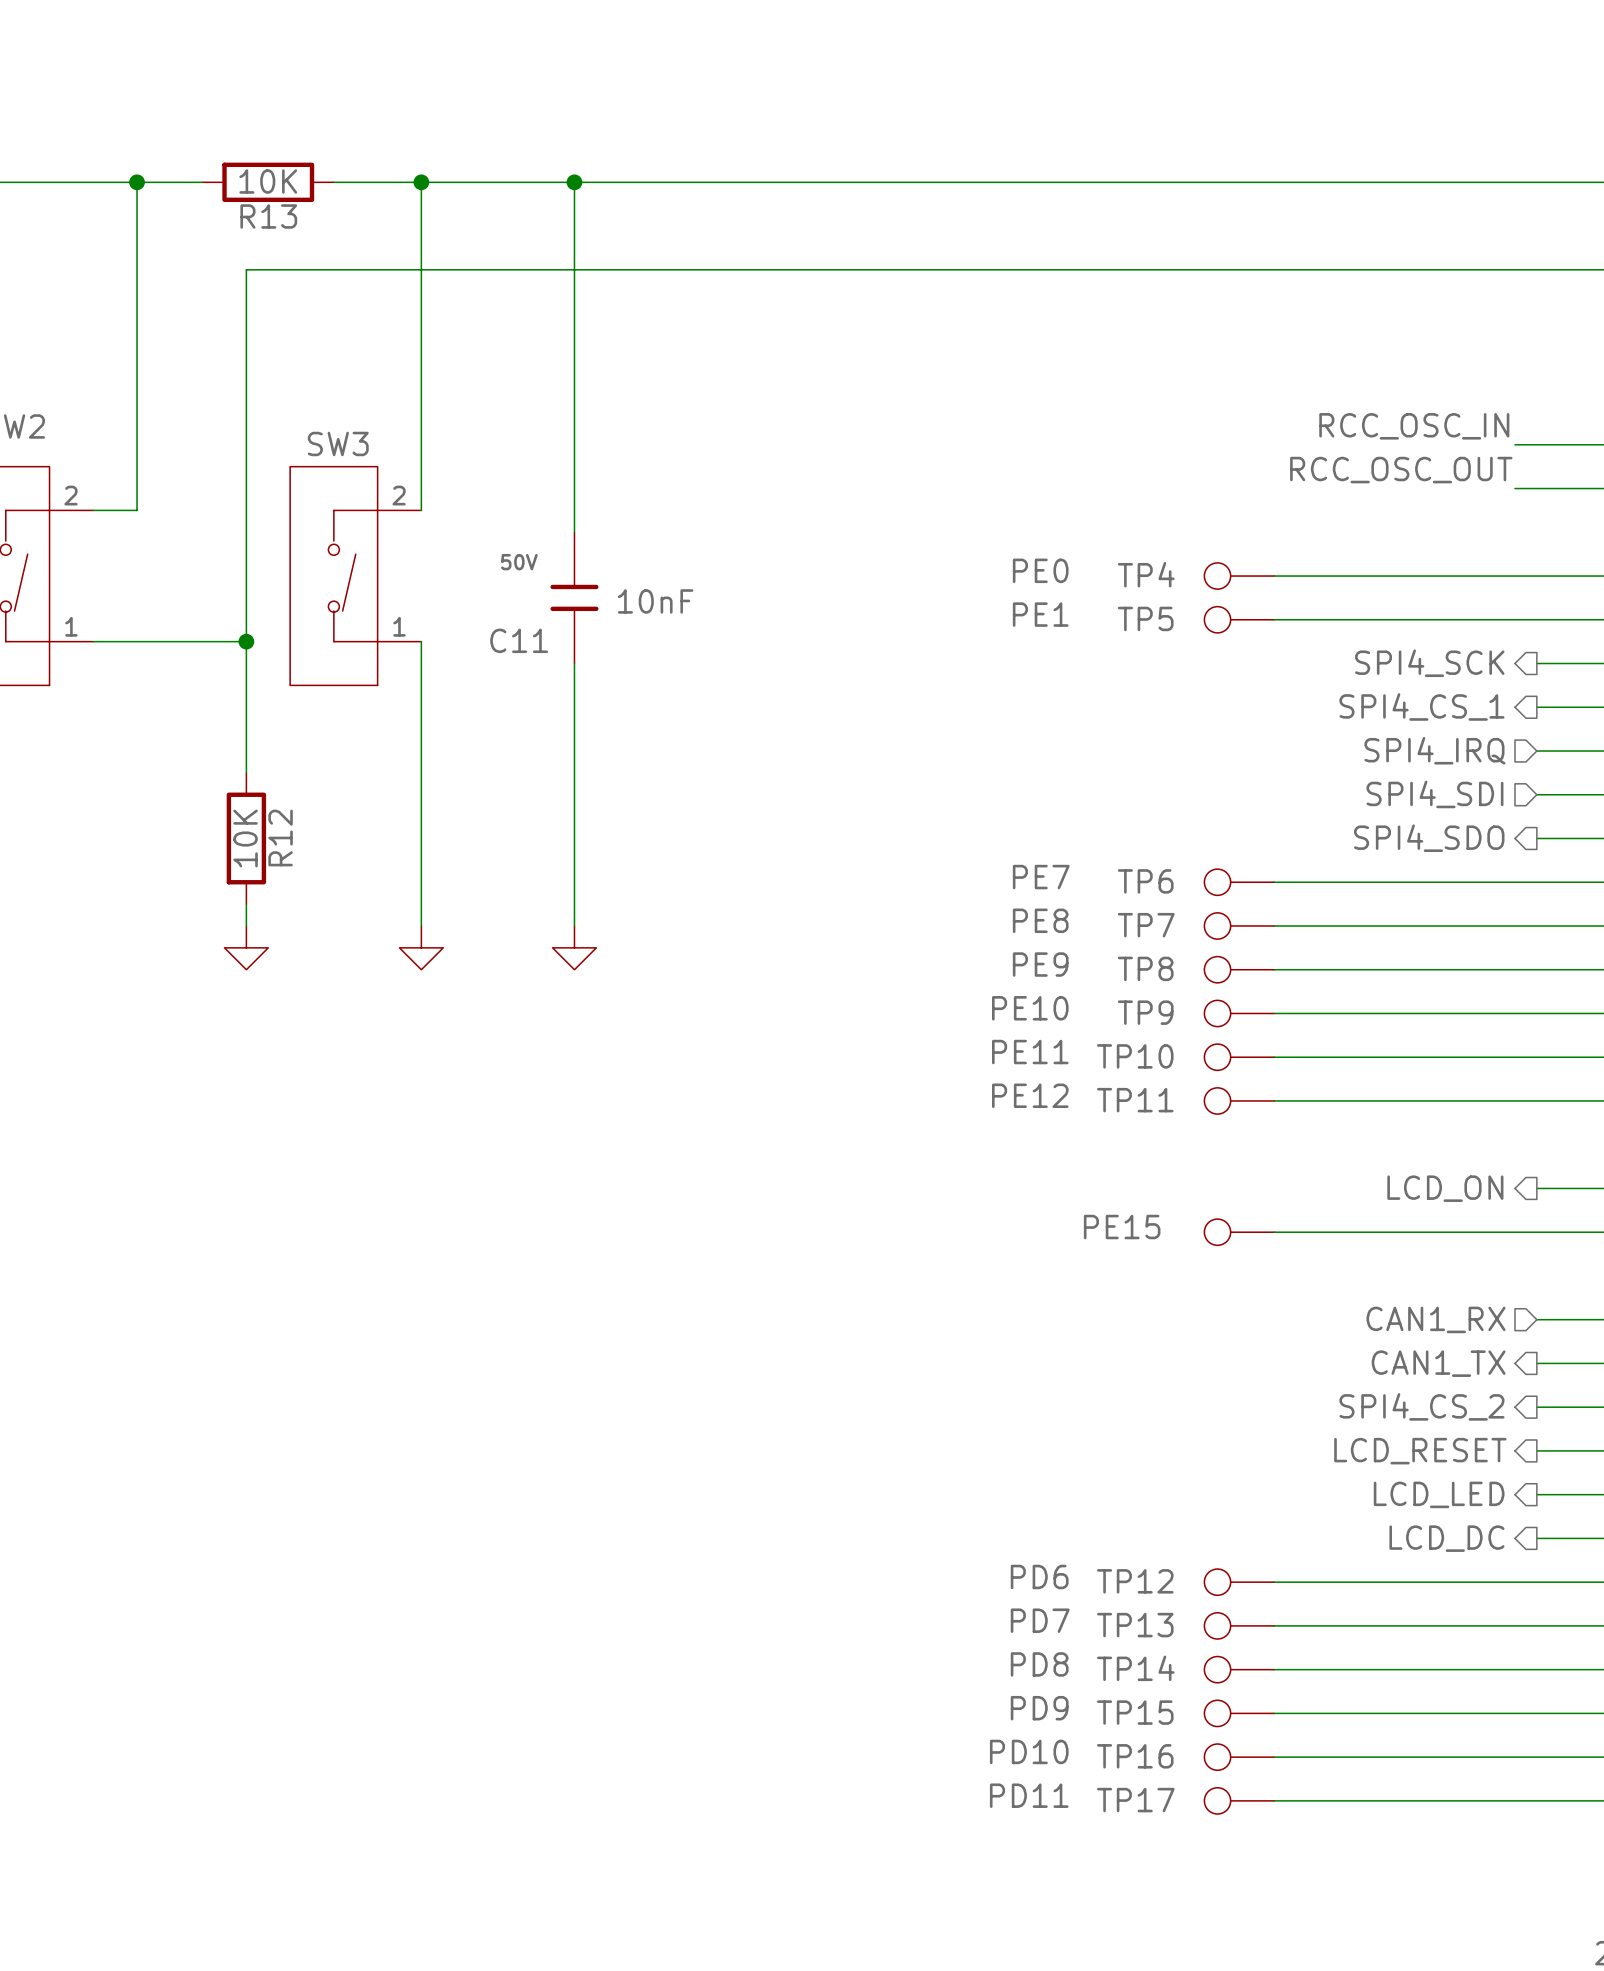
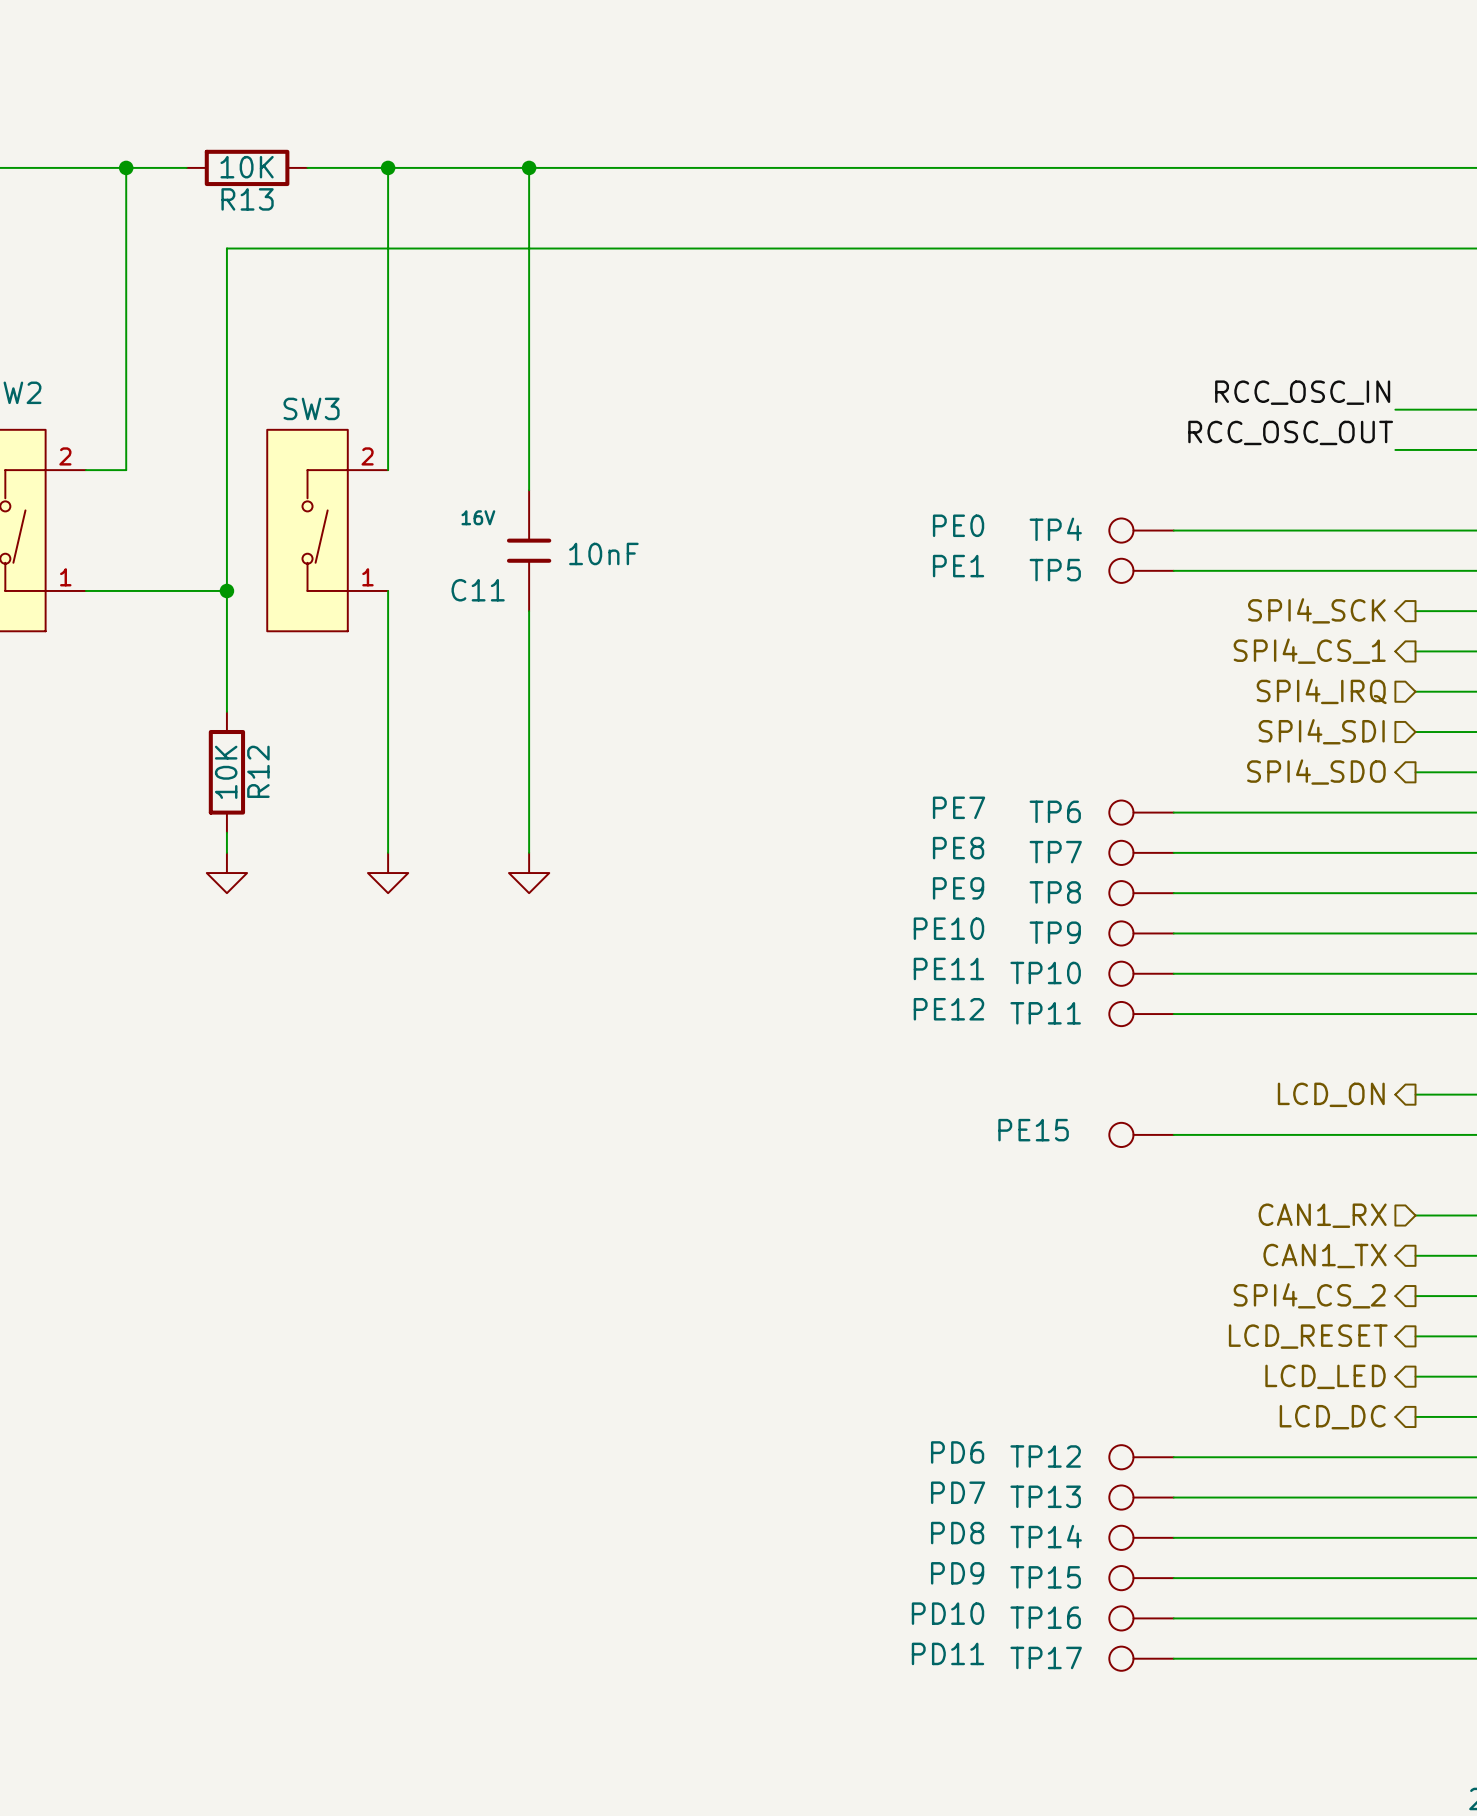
C11 text: 50V (519, 562) -> 16V (478, 517)

